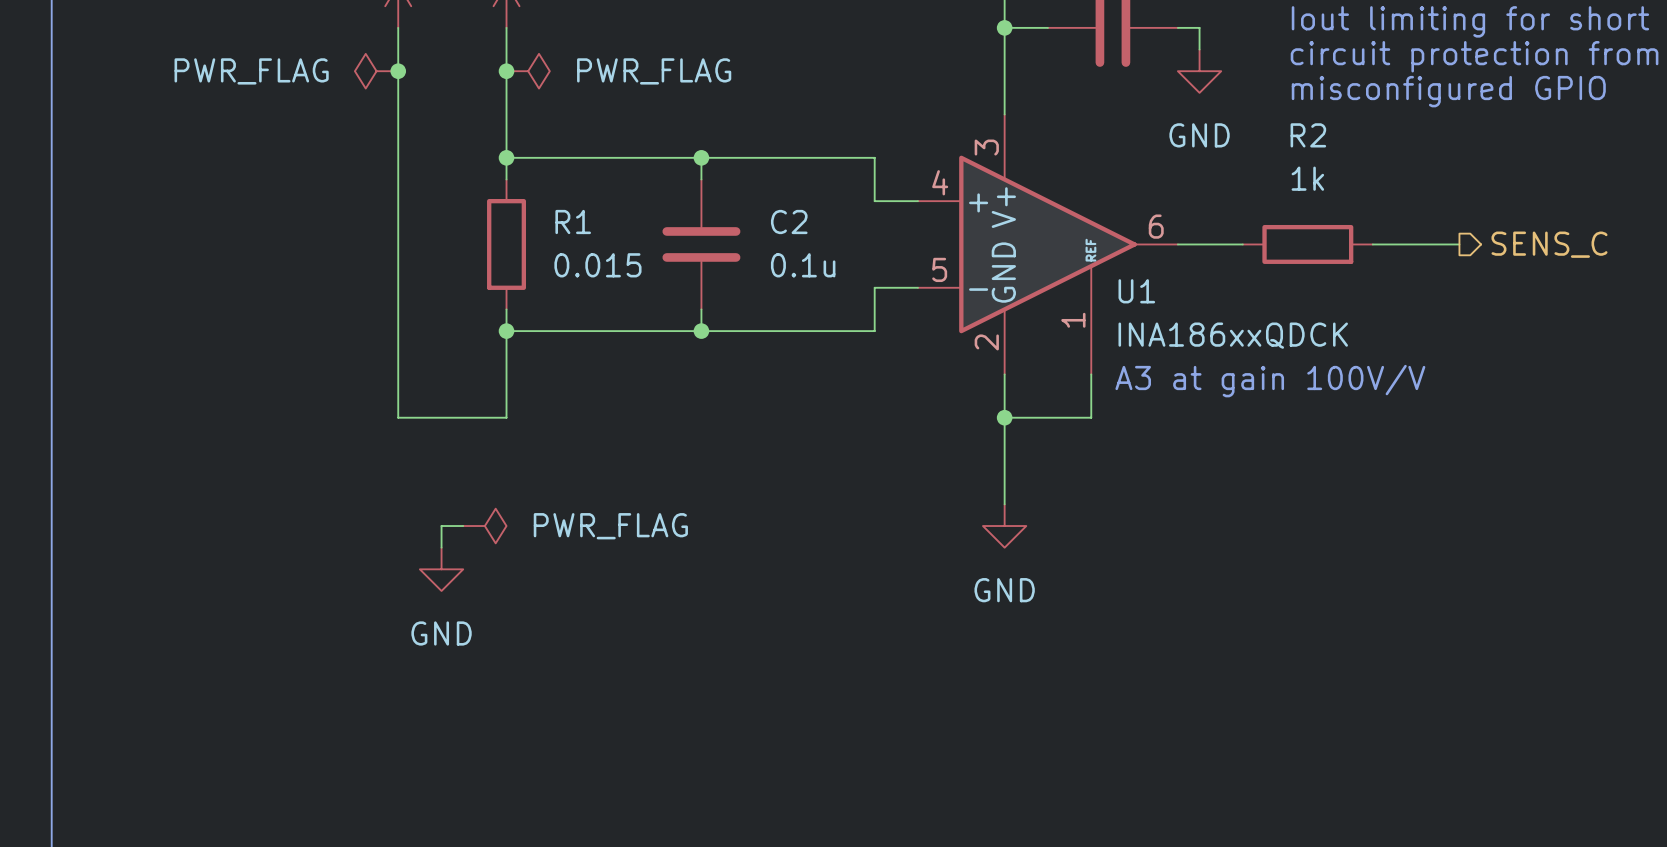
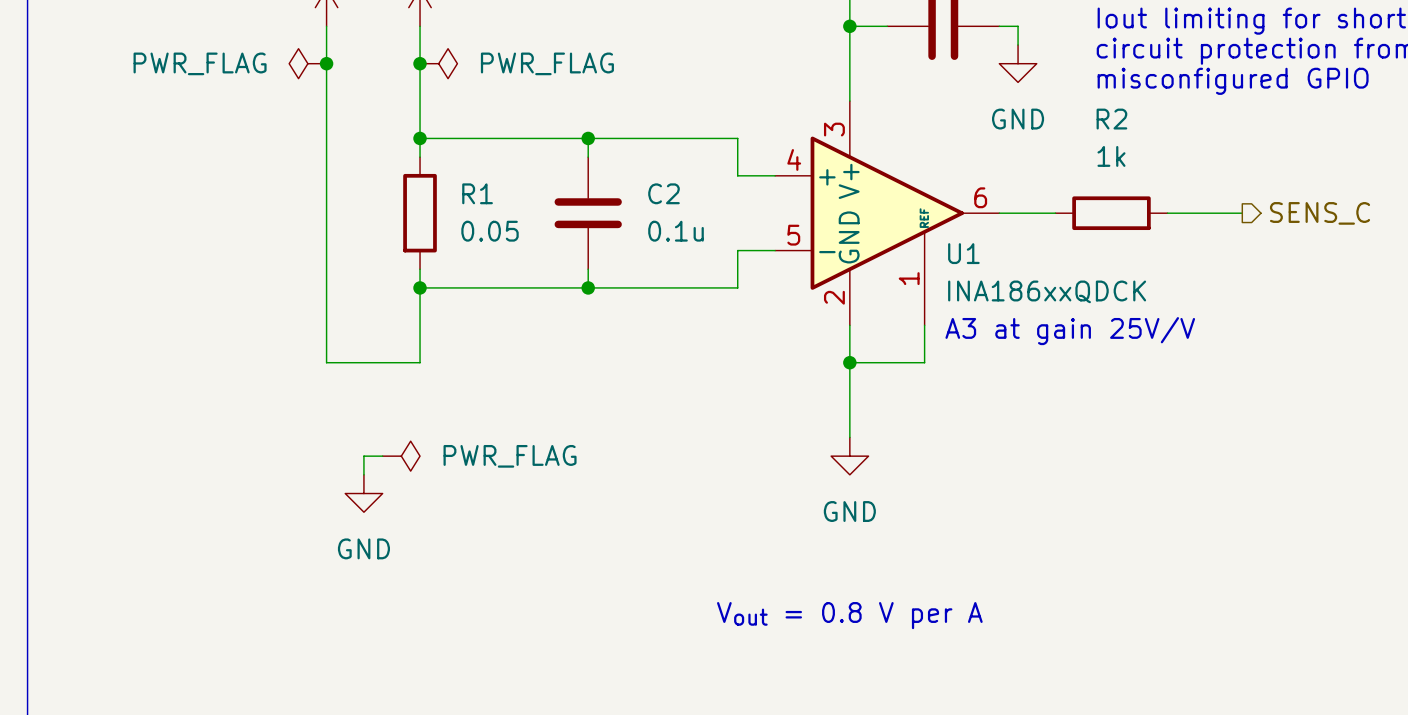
R1 value: 0.015 (597, 265) -> 0.05 (490, 231)
text: A3 at gain 100V/V (1270, 381) -> A3 at gain 25V/V (1070, 331)
text: none -> Vout = 0.8 V per A (849, 615)

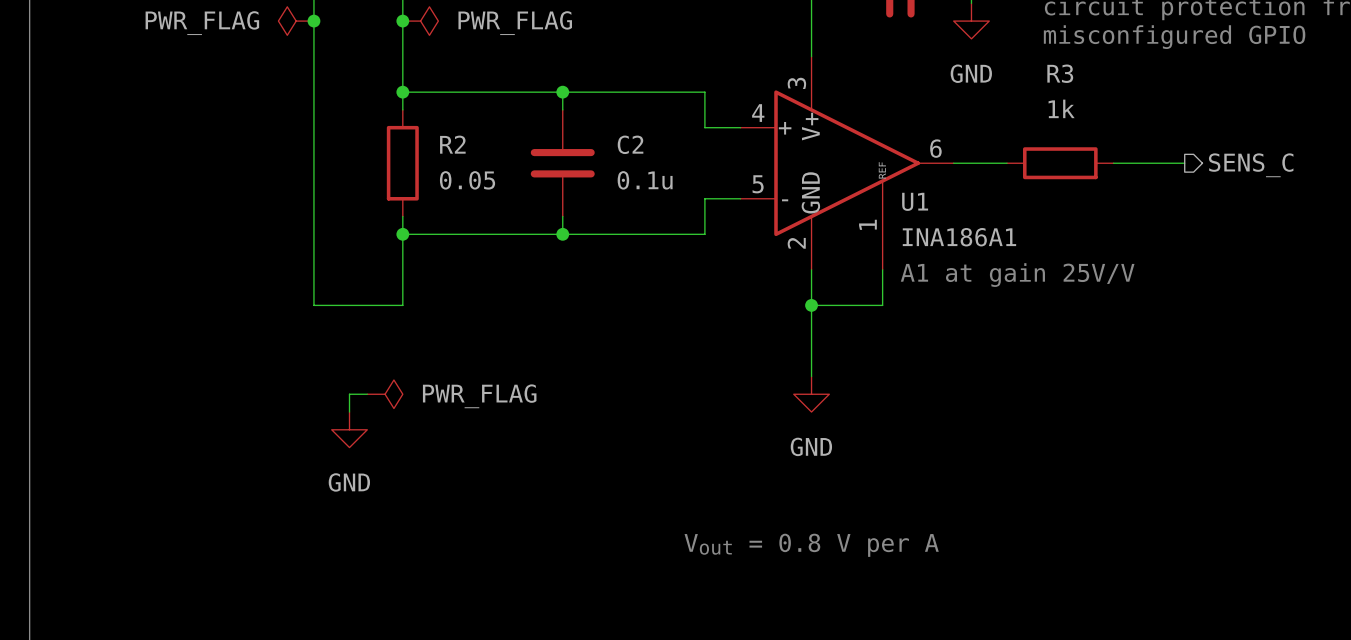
R2 name: R2 (1111, 119) -> R3 (1060, 73)
R1 name: R1 (477, 193) -> R2 (452, 144)
U1 value: INA186xxQDCK (1047, 291) -> INA186A1 (959, 237)
text: A3 at gain 25V/V (1070, 331) -> A1 at gain 25V/V (1017, 275)

